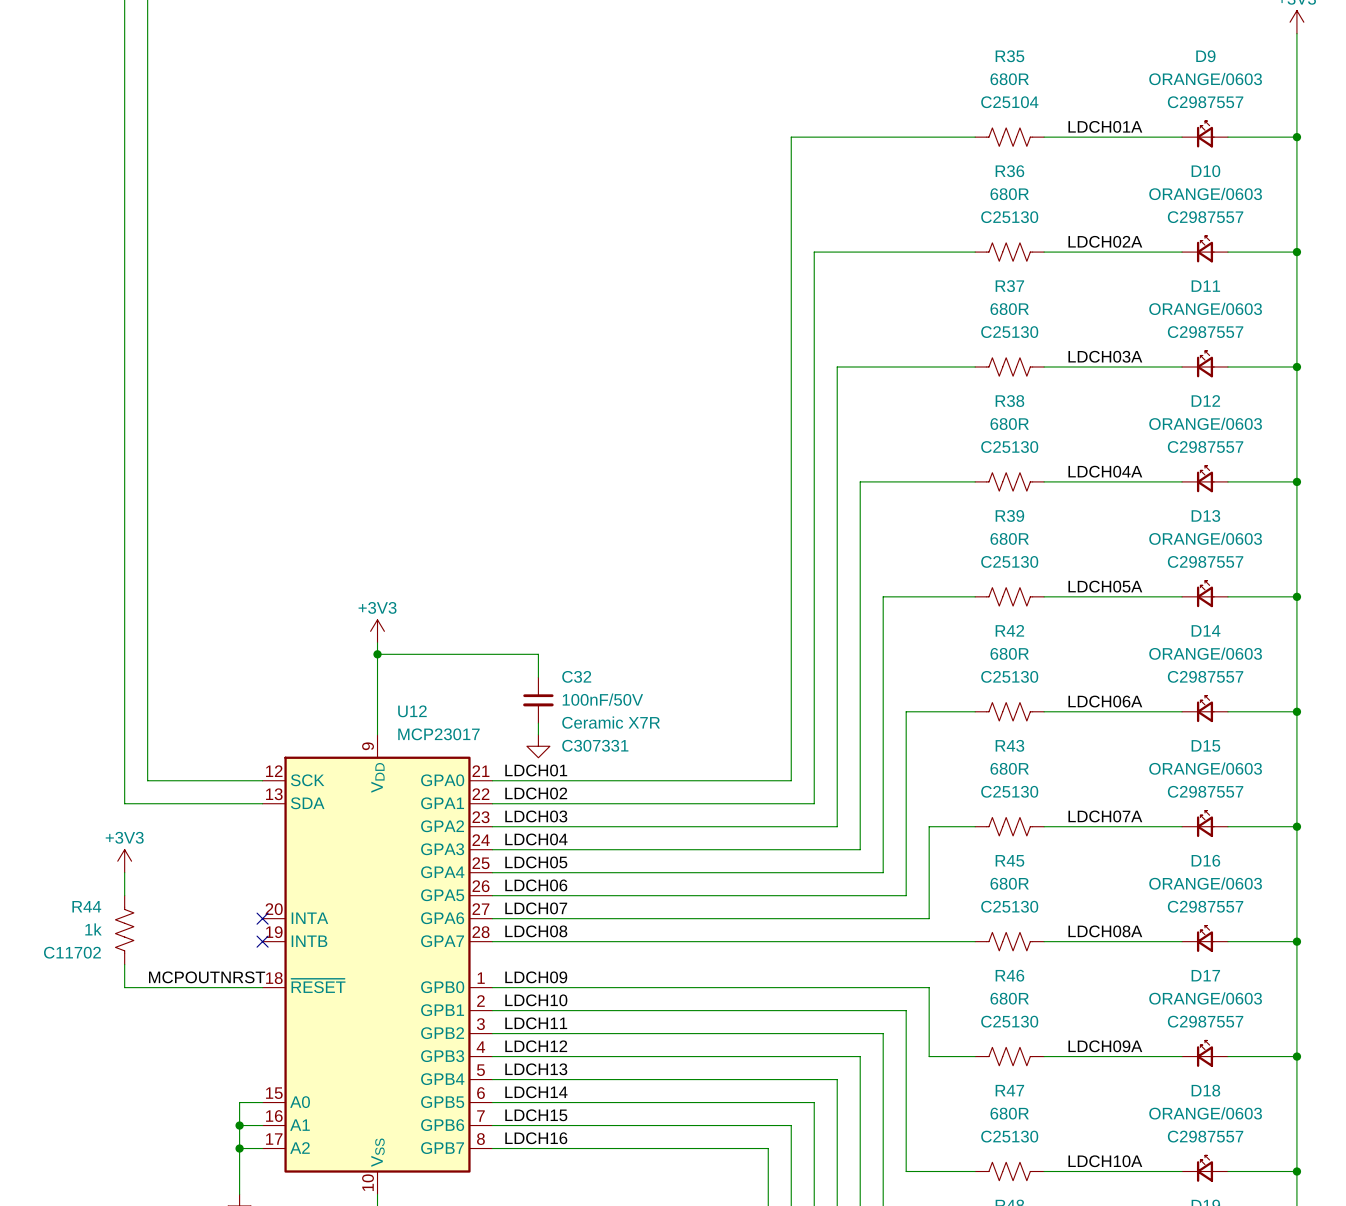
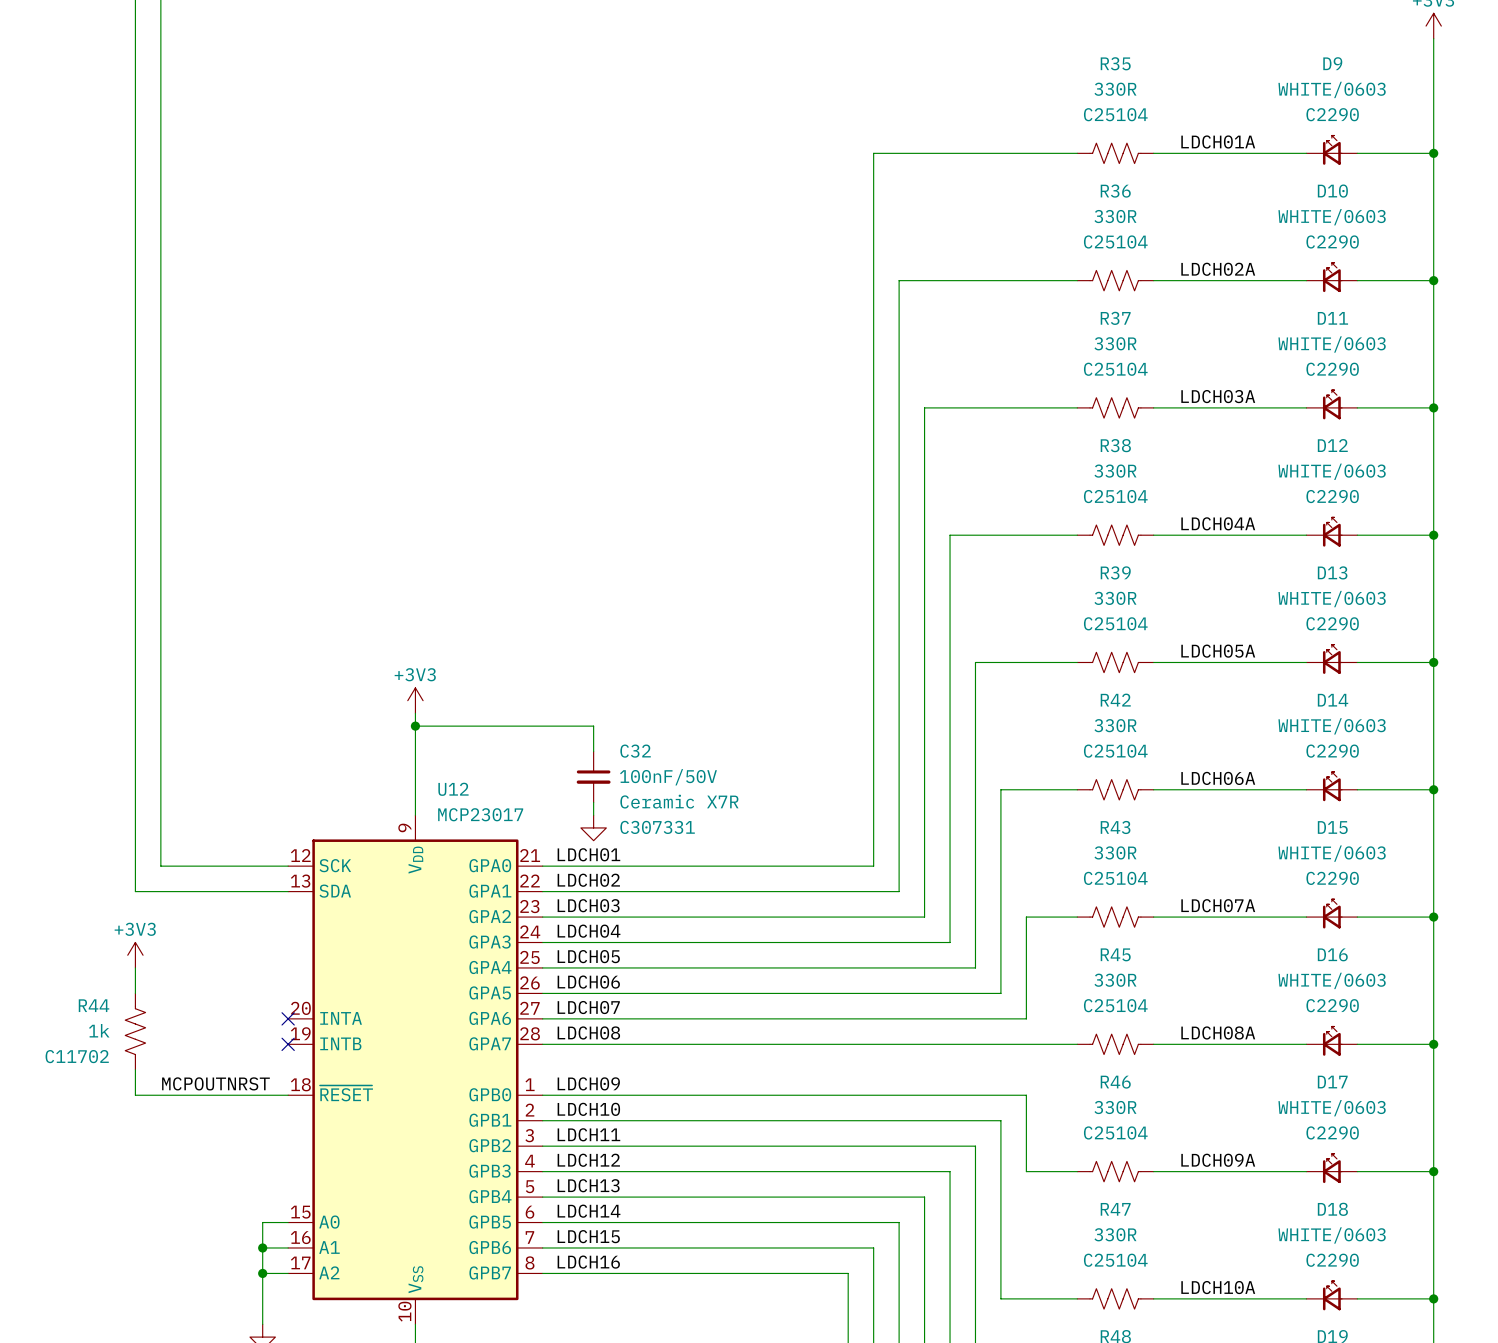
R35 value: 680R (1009, 79) -> 330R (1115, 89)
D9 value: ORANGE/0603 (1205, 79) -> WHITE/0603 (1332, 89)
D9 text: C2987557 (1205, 102) -> C2290 (1332, 114)
D10 value: ORANGE/0603 (1205, 193) -> WHITE/0603 (1332, 217)
R36 value: 680R (1009, 194) -> 330R (1115, 216)
R36 text: C25130 (1009, 217) -> C25104 (1115, 241)
D10 text: C2987557 (1205, 217) -> C2290 (1332, 241)
D11 value: ORANGE/0603 (1205, 308) -> WHITE/0603 (1332, 344)
R37 value: 680R (1009, 309) -> 330R (1115, 343)
R37 text: C25130 (1009, 332) -> C25104 (1115, 369)
D11 text: C2987557 (1205, 332) -> C2290 (1332, 369)
D12 value: ORANGE/0603 (1205, 423) -> WHITE/0603 (1332, 471)
R38 value: 680R (1009, 424) -> 330R (1115, 471)
R38 text: C25130 (1009, 447) -> C25104 (1115, 496)
D12 text: C2987557 (1205, 447) -> C2290 (1332, 496)
R39 value: 680R (1009, 538) -> 330R (1115, 598)
D13 value: ORANGE/0603 (1205, 538) -> WHITE/0603 (1332, 599)
R39 text: C25130 (1009, 561) -> C25104 (1115, 623)
D13 text: C2987557 (1205, 561) -> C2290 (1332, 623)
R42 value: 680R (1009, 653) -> 330R (1115, 725)
D14 value: ORANGE/0603 (1205, 653) -> WHITE/0603 (1332, 726)
R42 text: C25130 (1009, 676) -> C25104 (1115, 751)
D14 text: C2987557 (1205, 676) -> C2290 (1332, 751)
R43 value: 680R (1009, 768) -> 330R (1115, 852)
D15 value: ORANGE/0603 (1205, 768) -> WHITE/0603 (1332, 853)
R43 text: C25130 (1009, 791) -> C25104 (1115, 878)
D15 text: C2987557 (1205, 791) -> C2290 (1332, 878)
R45 value: 680R (1009, 883) -> 330R (1115, 980)
D16 value: ORANGE/0603 (1205, 883) -> WHITE/0603 (1332, 980)
R45 text: C25130 (1009, 906) -> C25104 (1115, 1005)
D16 text: C2987557 (1205, 906) -> C2290 (1332, 1005)
R46 value: 680R (1009, 998) -> 330R (1115, 1107)
D17 value: ORANGE/0603 (1205, 998) -> WHITE/0603 (1332, 1108)
R46 text: C25130 (1009, 1021) -> C25104 (1115, 1132)
D17 text: C2987557 (1205, 1021) -> C2290 (1332, 1132)
R47 value: 680R (1009, 1113) -> 330R (1115, 1234)
D18 value: ORANGE/0603 (1205, 1113) -> WHITE/0603 (1332, 1235)
R47 text: C25130 (1009, 1136) -> C25104 (1115, 1260)
D18 text: C2987557 (1205, 1136) -> C2290 (1332, 1260)

